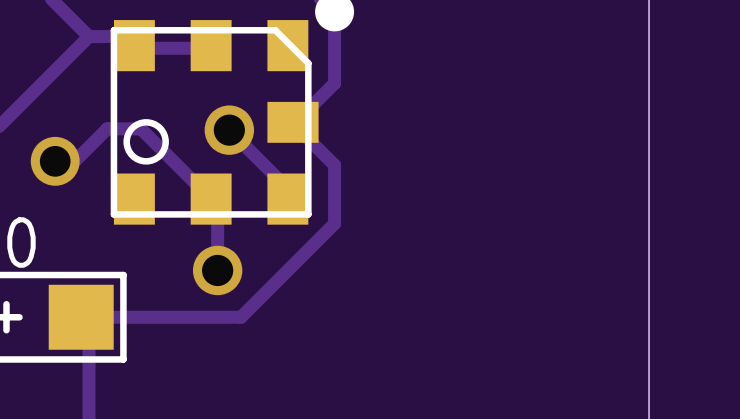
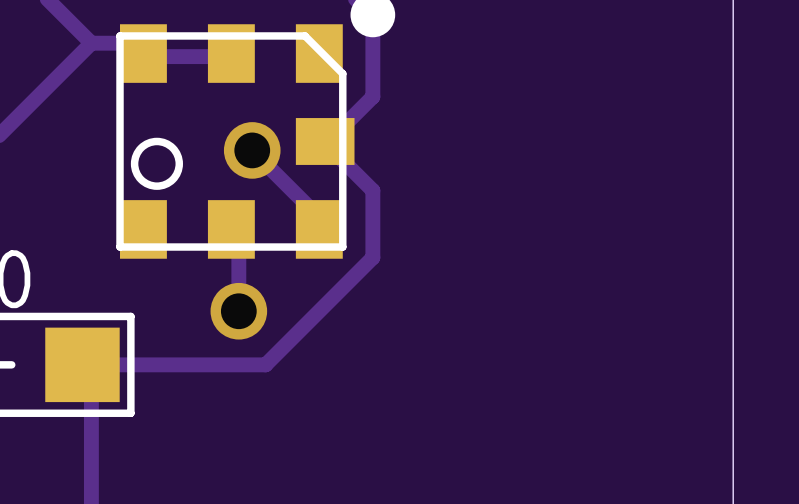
track: (55, 161) (74, 161) (107, 128) (140, 128) (211, 199) -> none
via: (55, 161) -> none

